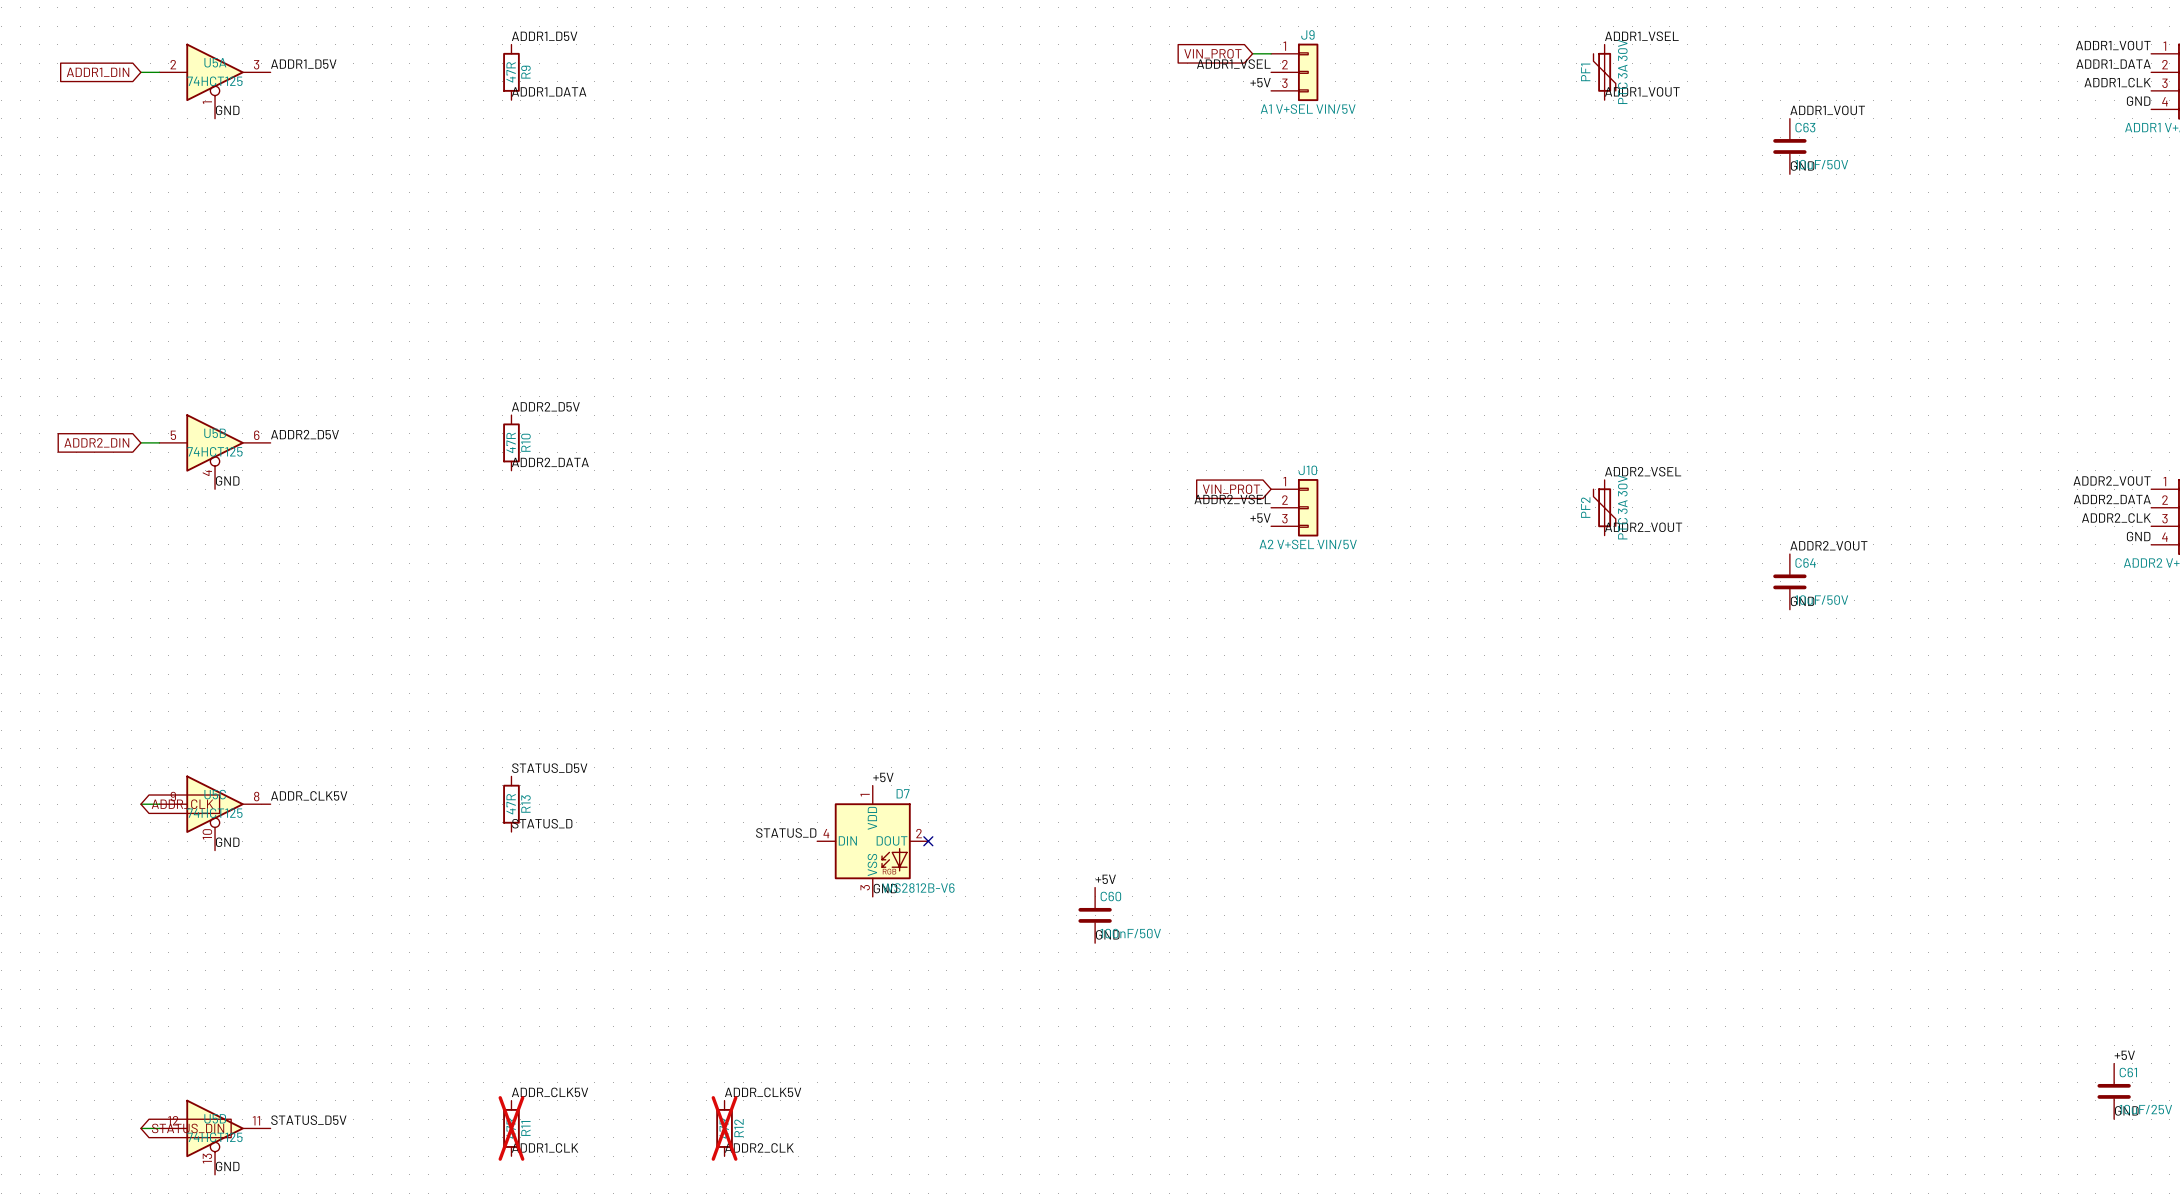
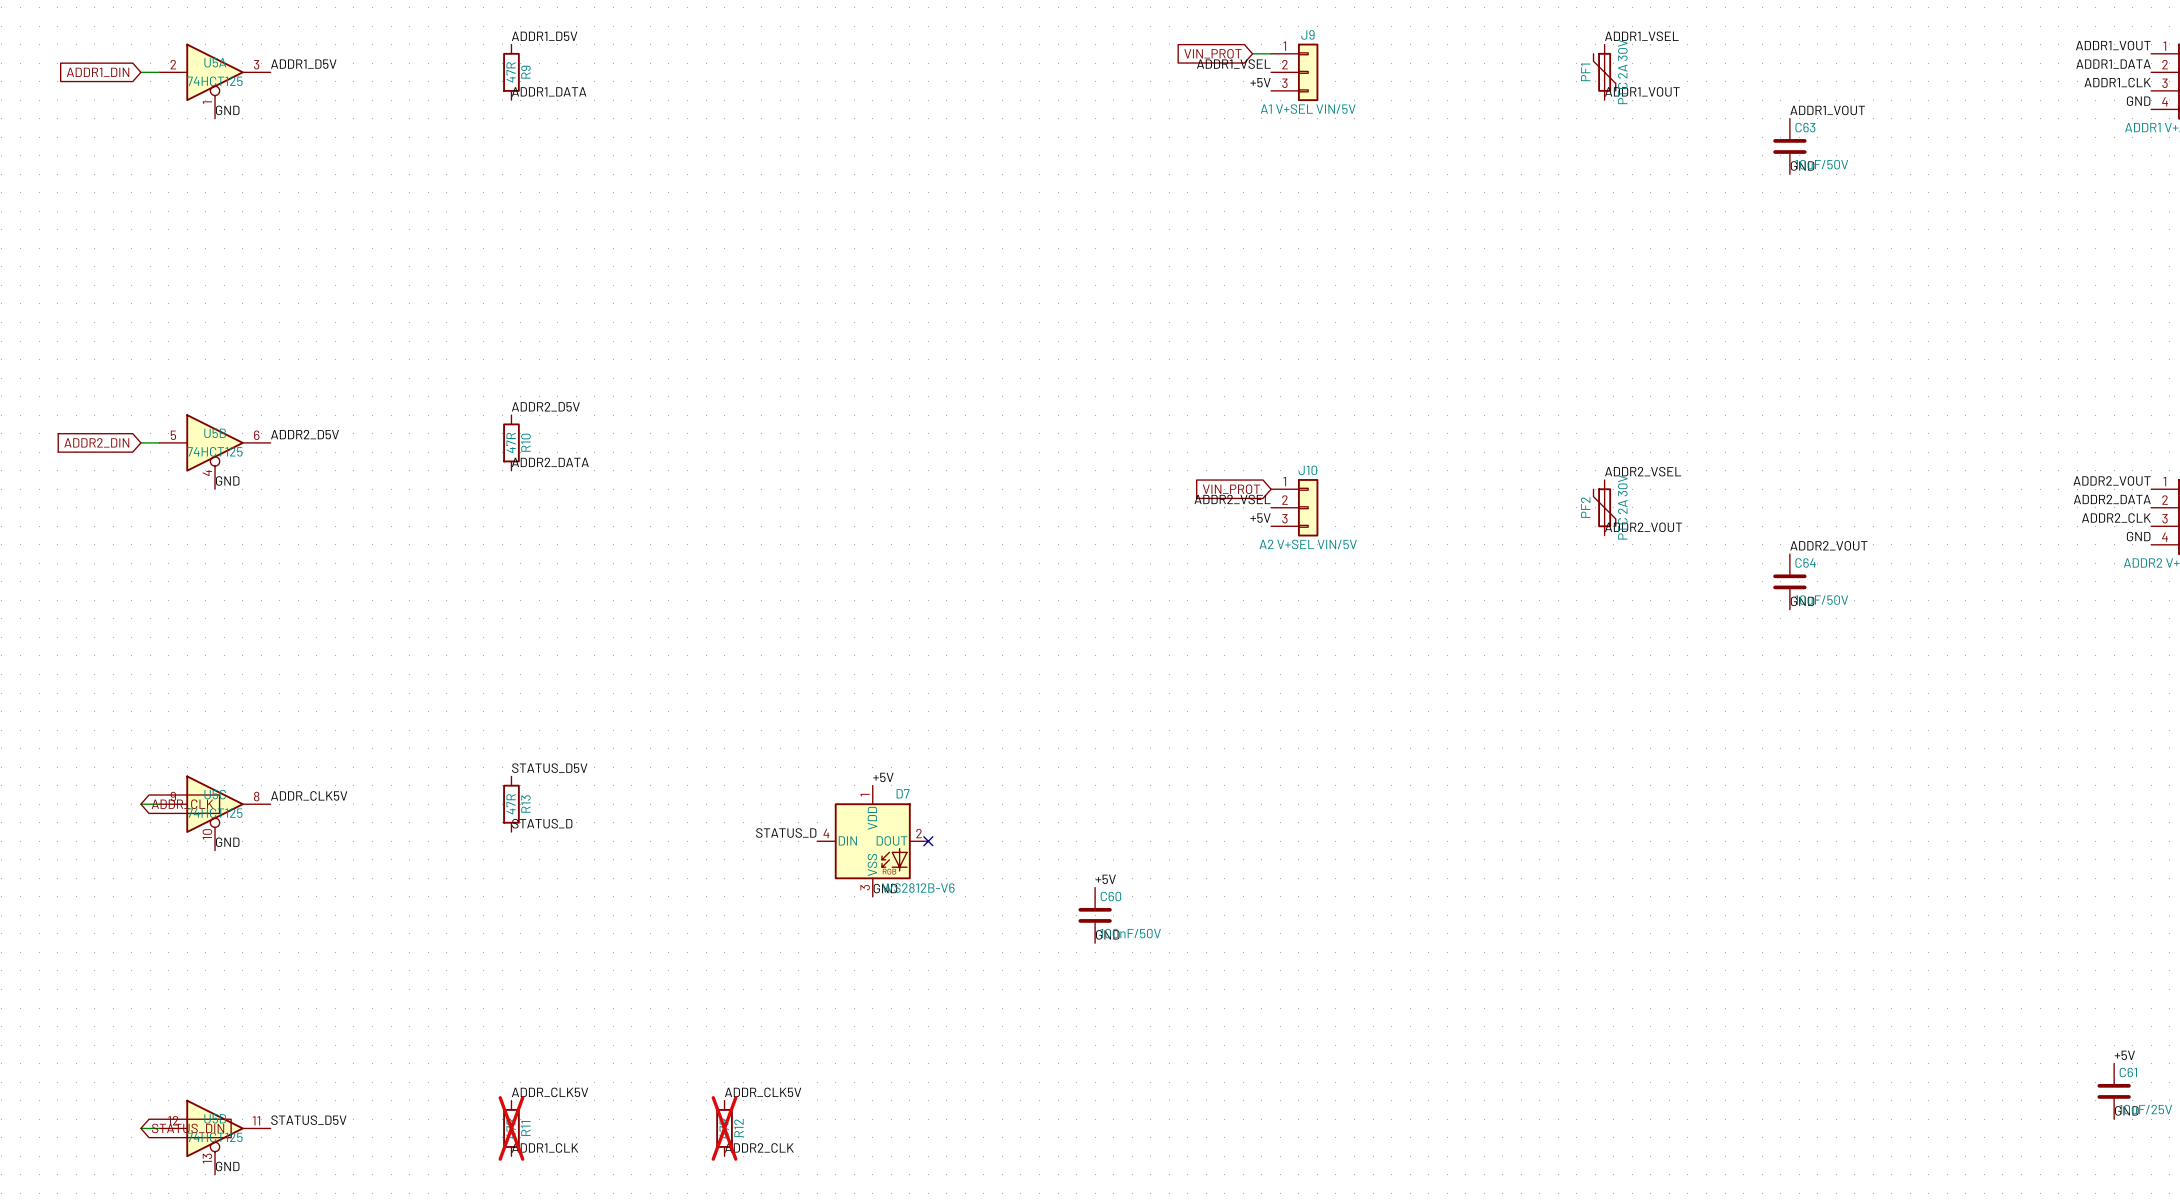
PF1 value: PTC 3A 30V (1622, 71) -> PTC 2A 30V (1622, 71)
PF2 value: PTC 3A 30V (1622, 507) -> PTC 2A 30V (1622, 507)

